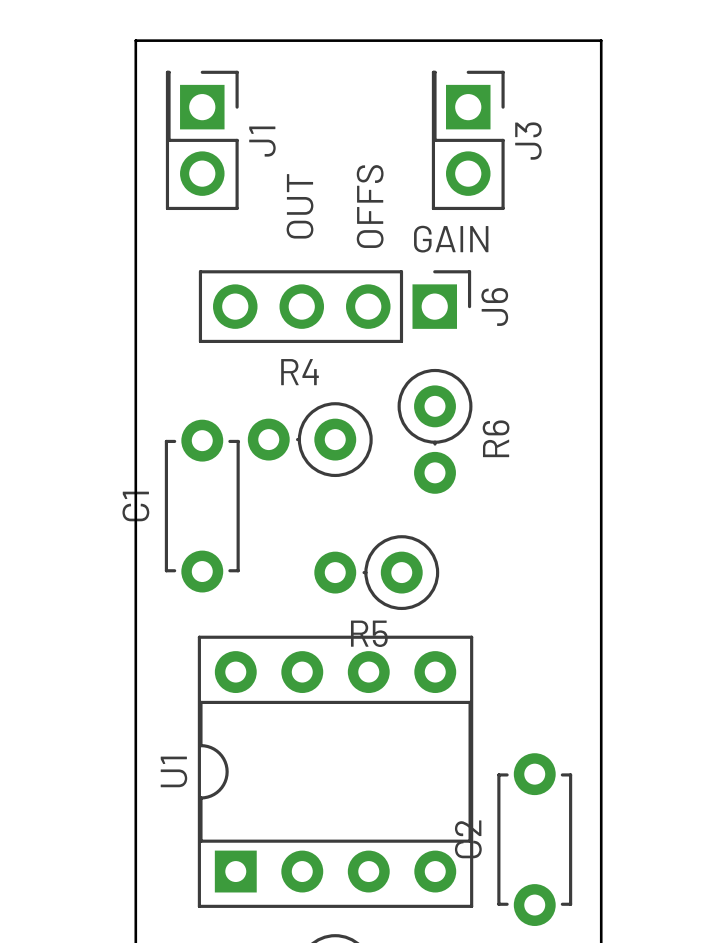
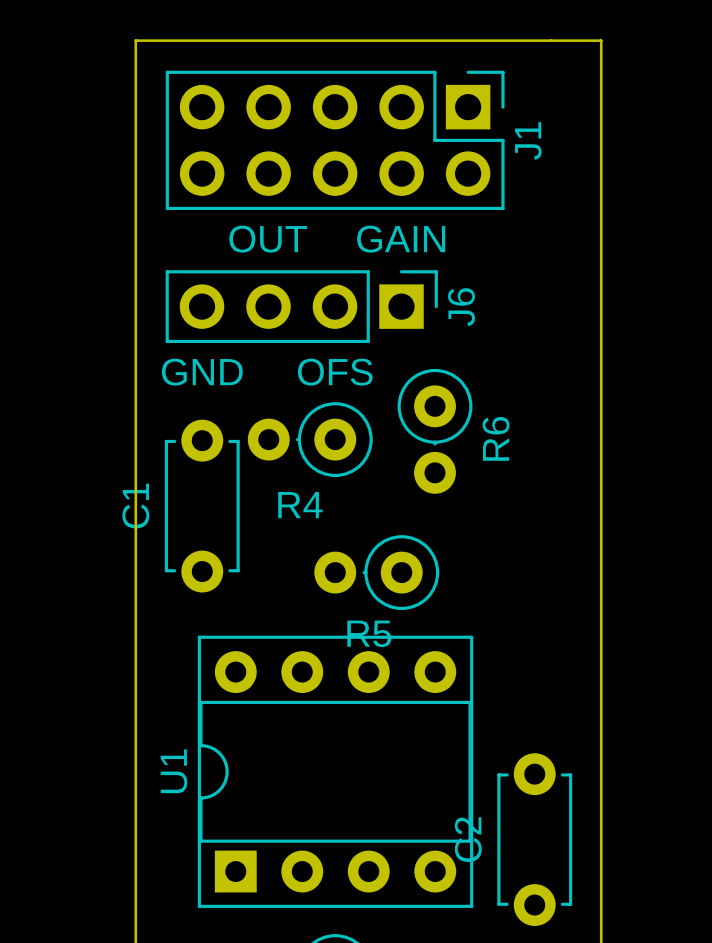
J1 footprint: [165, 70, 239, 211] -> [165, 70, 505, 211]
J3: (468, 140) -> none
J1 name position: J1 (262, 141) -> J1 (528, 141)
text rotation: 0° (299, 206) -> 90° clockwise (268, 239)
text: OFFS (370, 206) -> none
text position: GAIN (451, 239) -> GAIN (401, 239)
J6 position: (335, 306) -> (301, 306)
text: none -> GND (202, 372)
R4 name position: R4 (300, 372) -> R4 (300, 505)
text: none -> OFS (335, 372)

